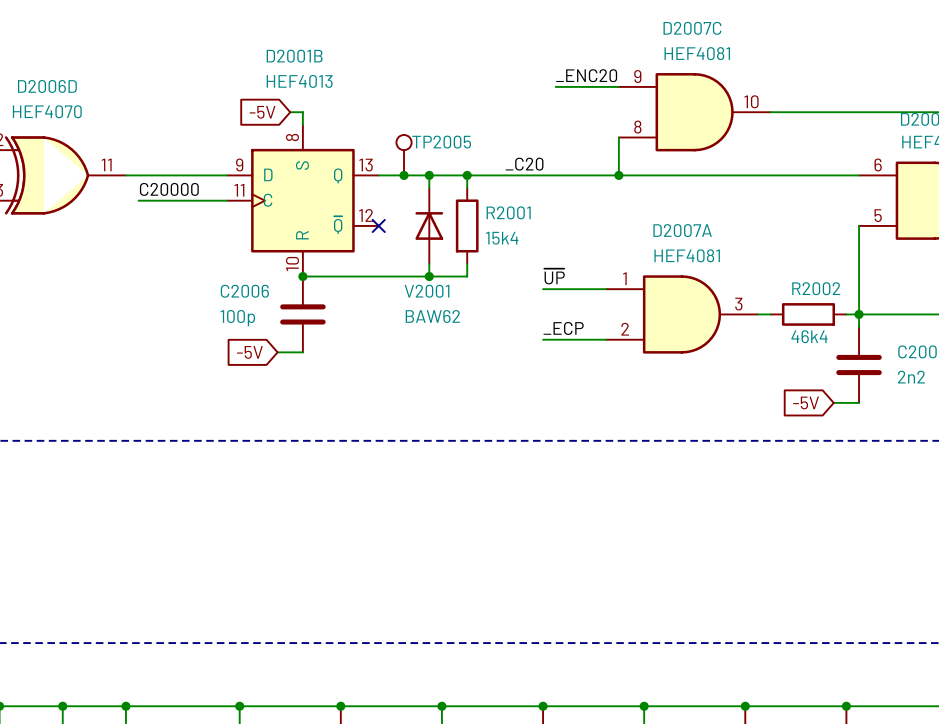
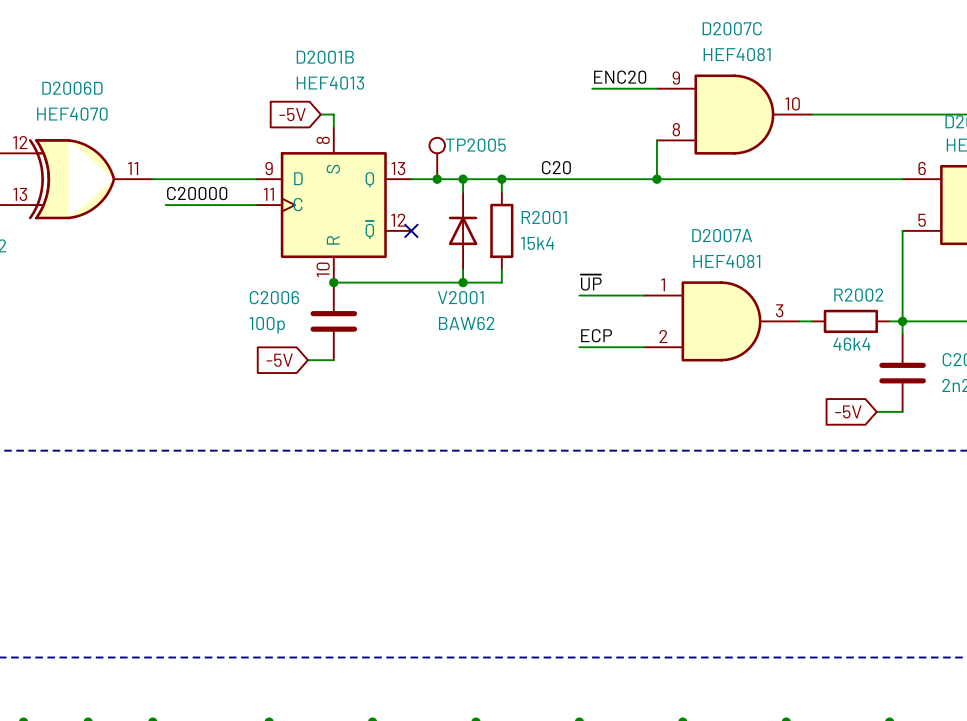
label: _ENC20 (586, 75) -> ENC20 (620, 77)
label: _C20 (524, 164) -> C20 (556, 167)
label: _ECP (563, 328) -> ECP (596, 335)

